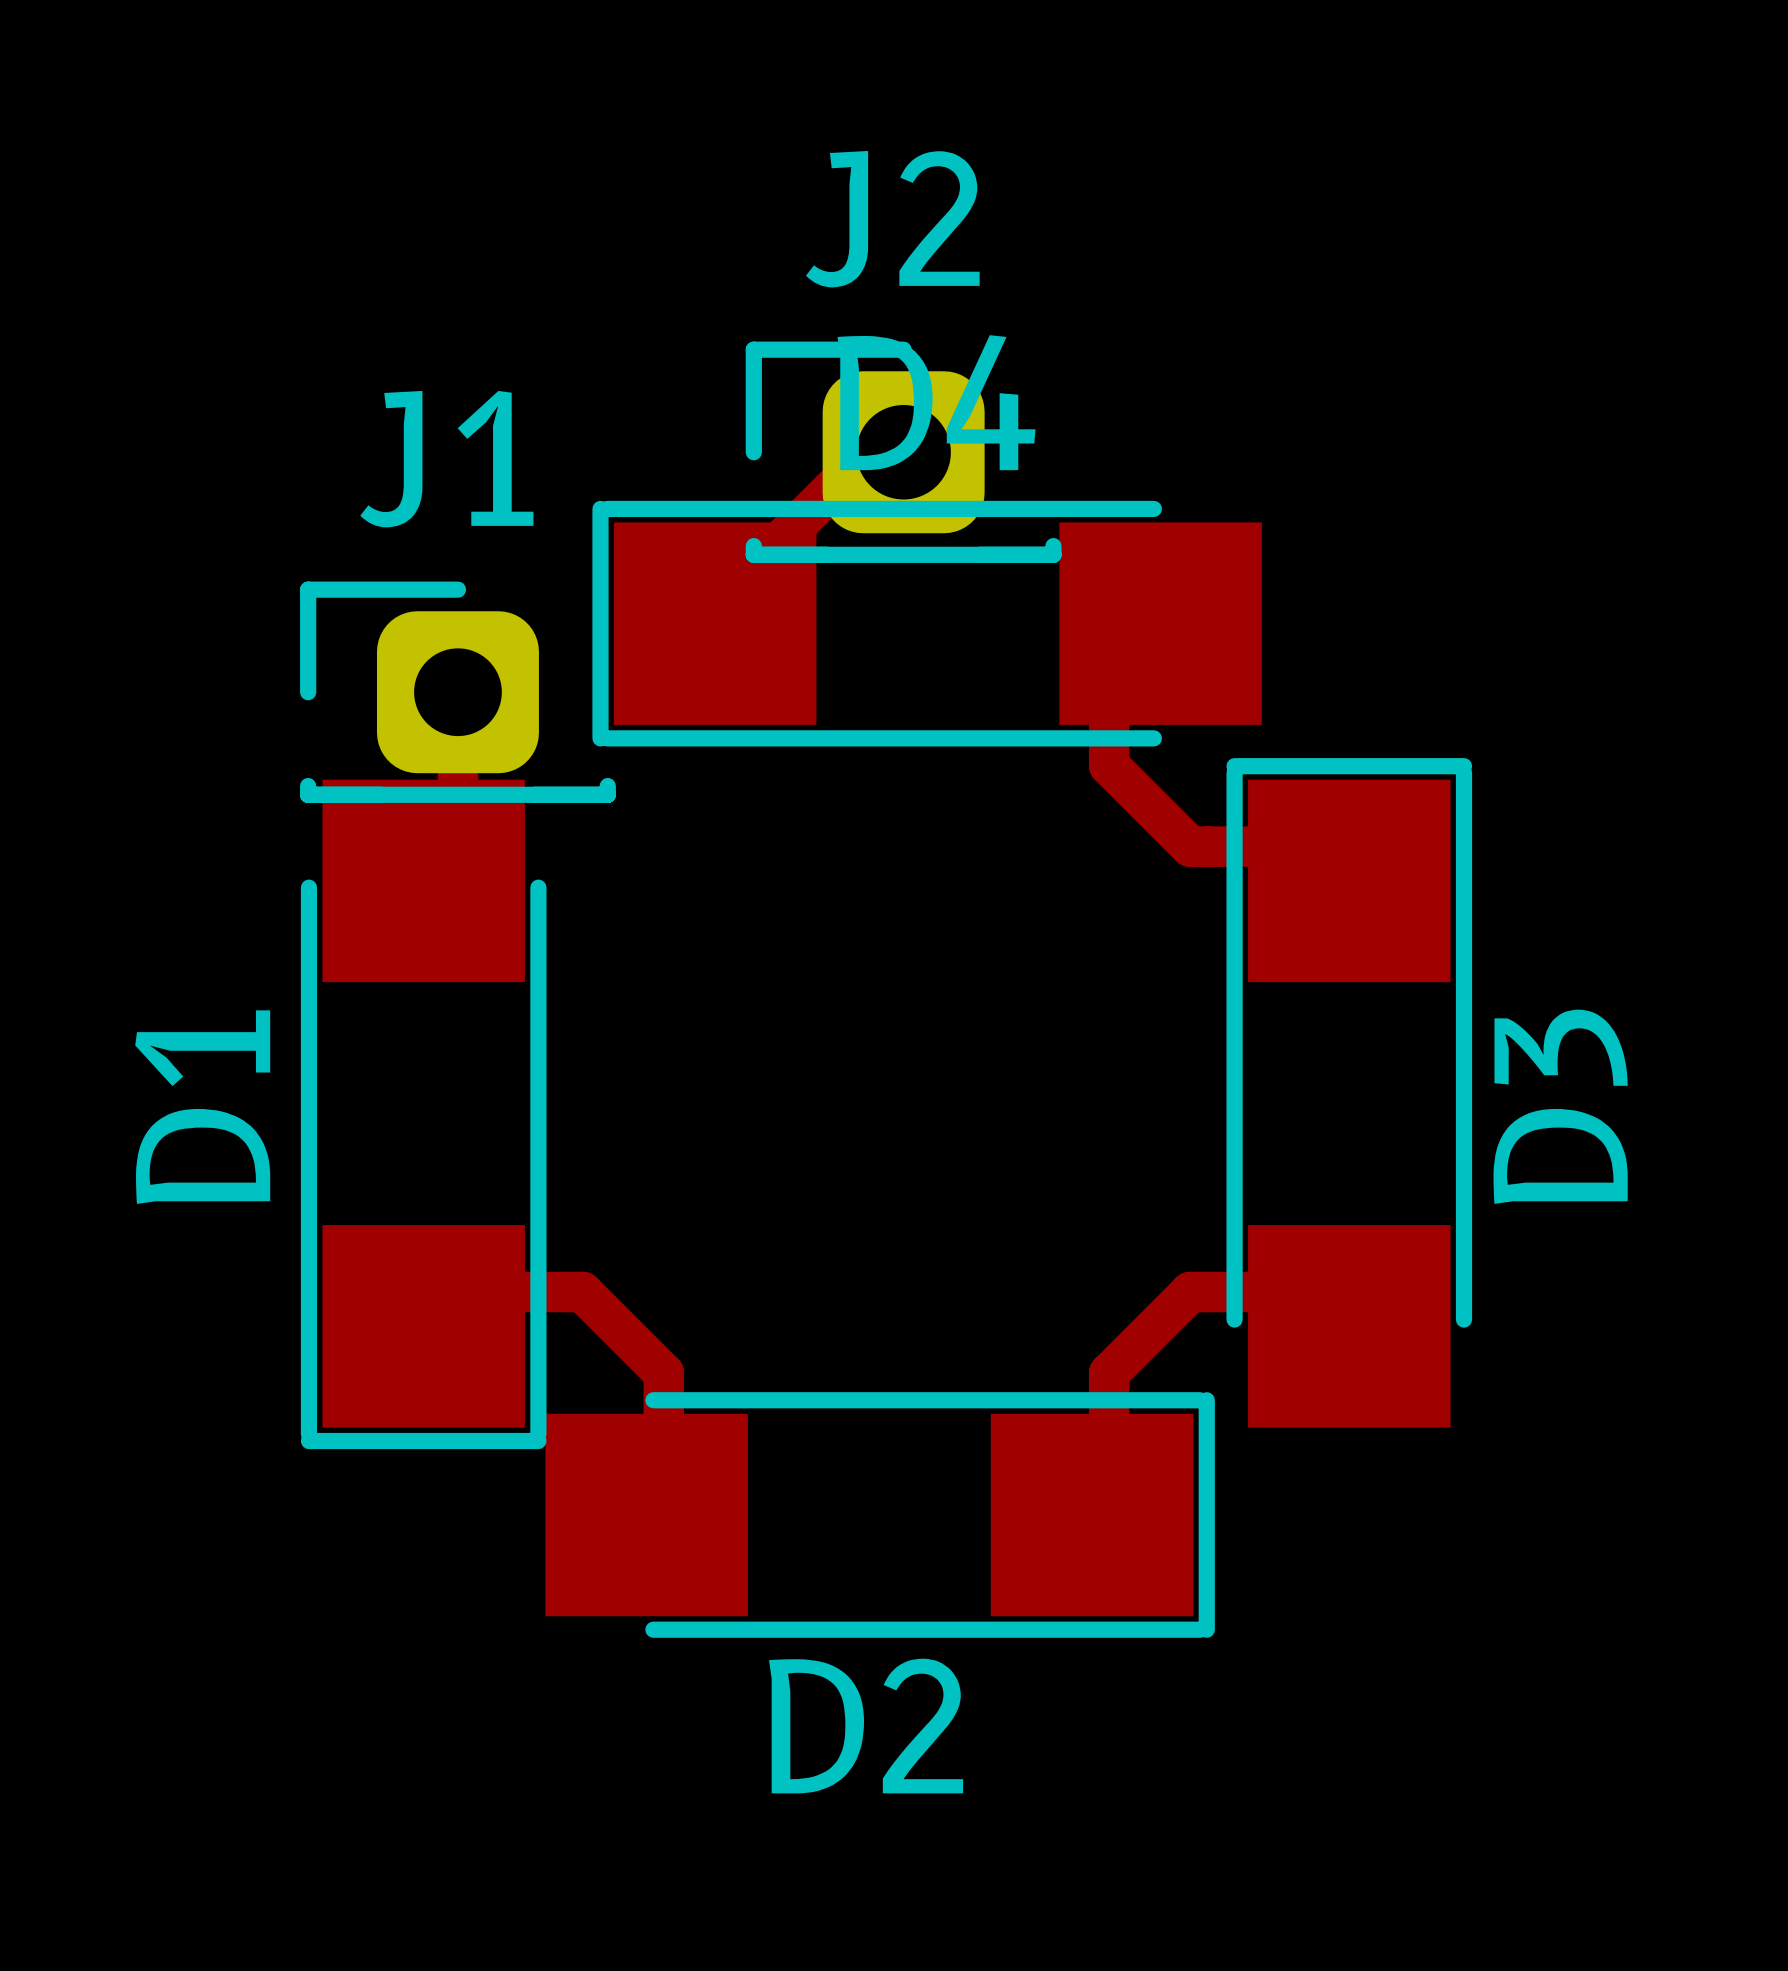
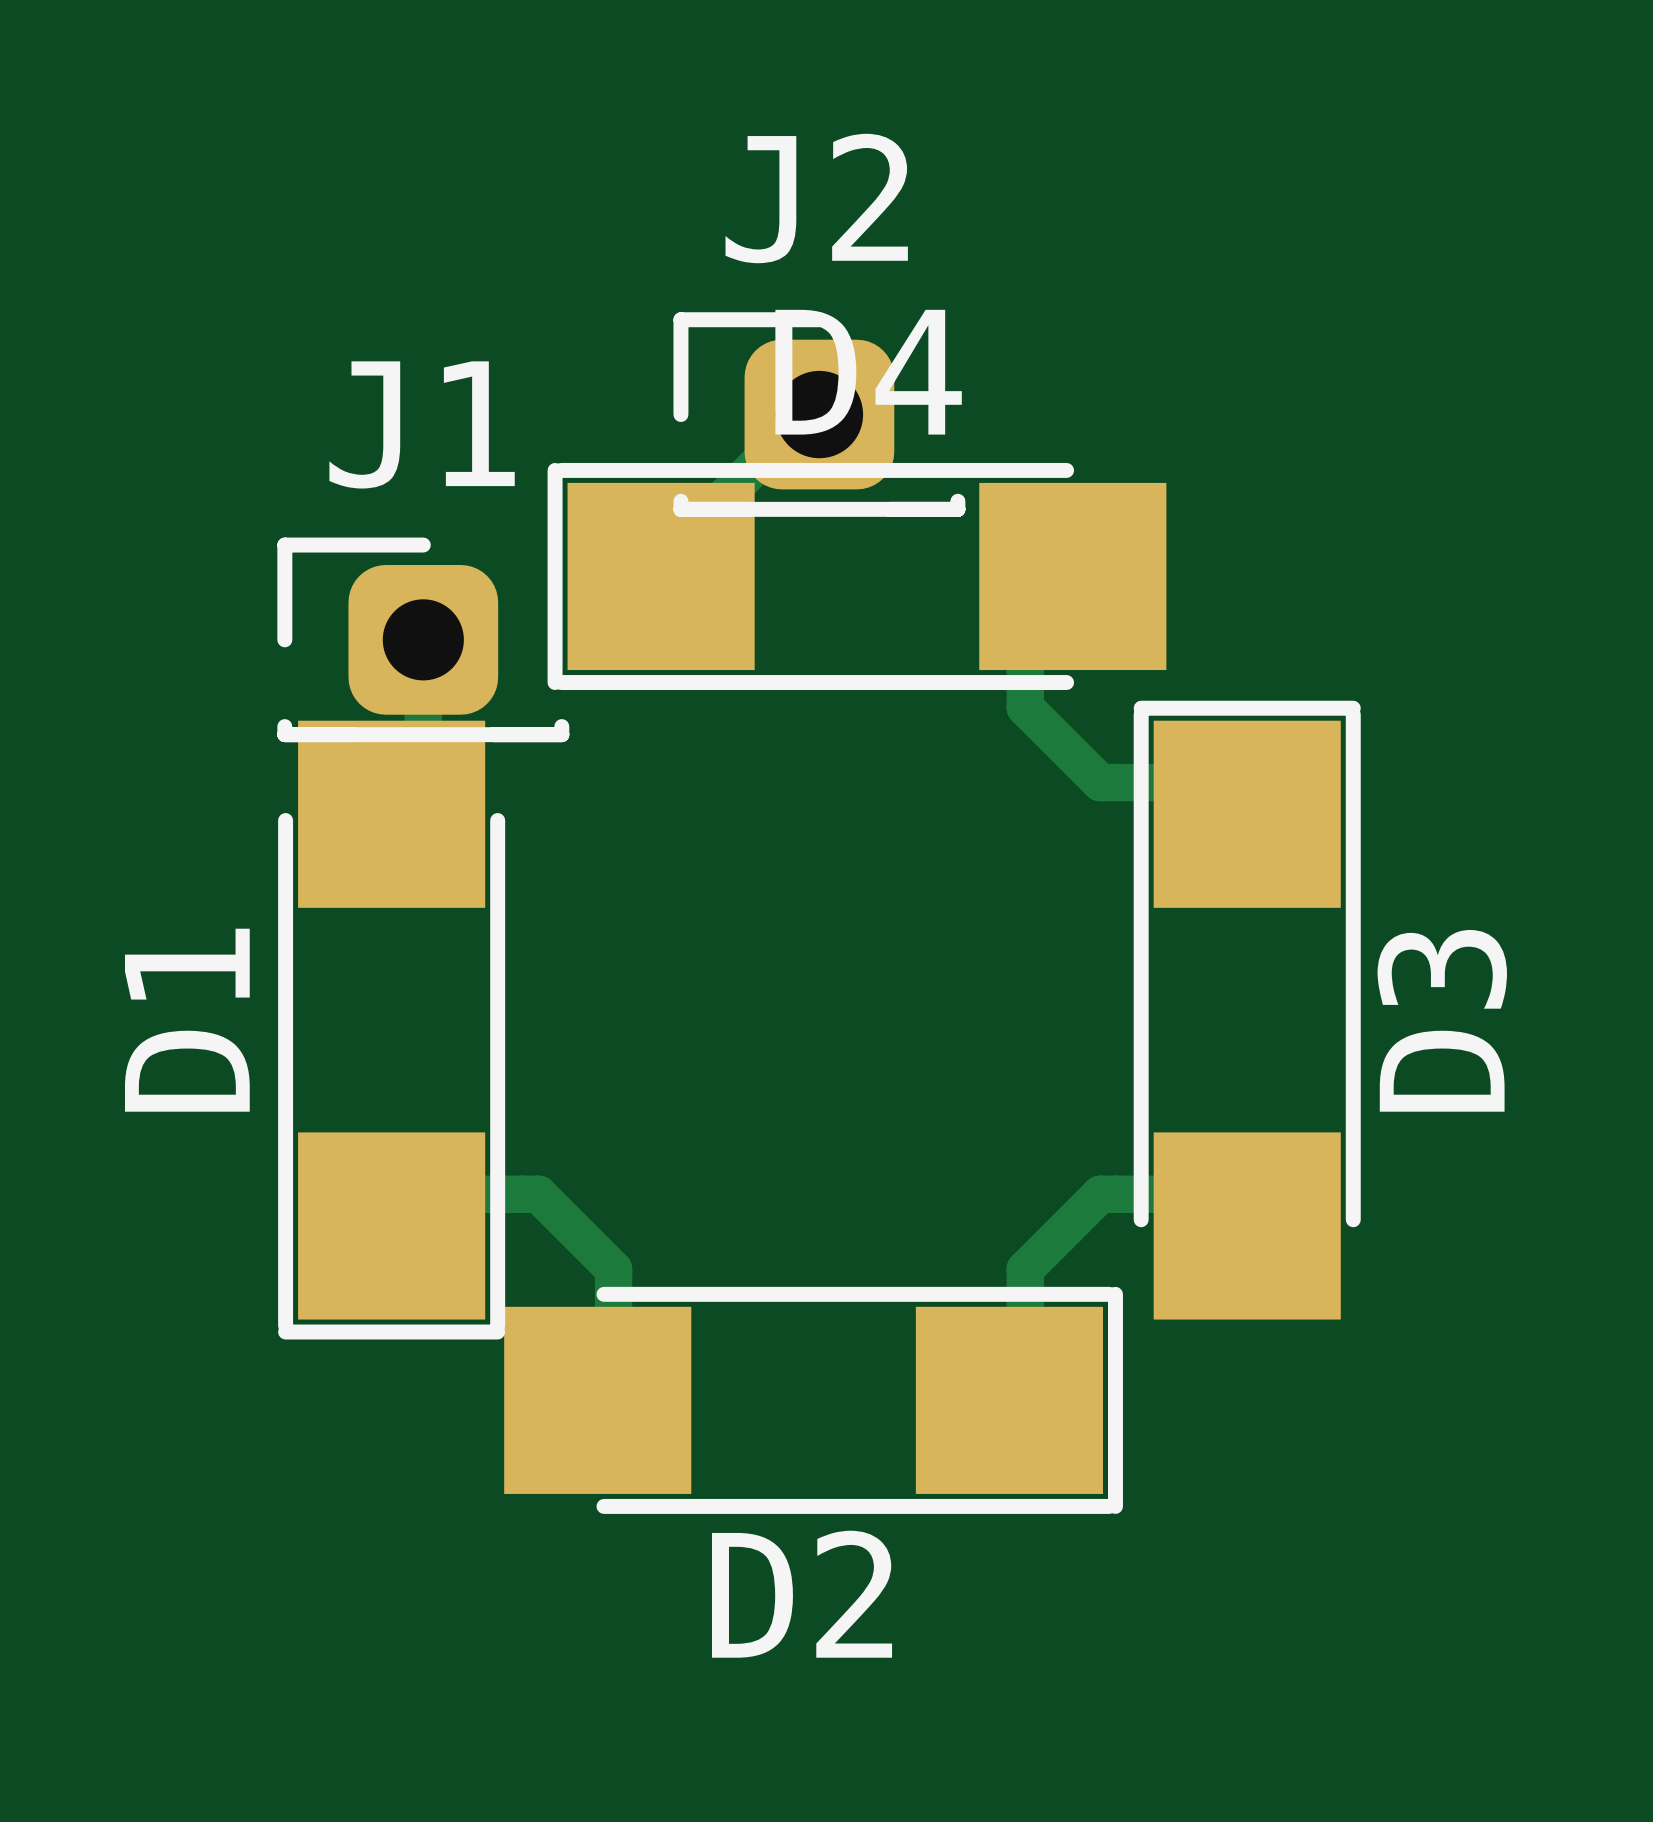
J2 position: (903, 452) -> (819, 414)

